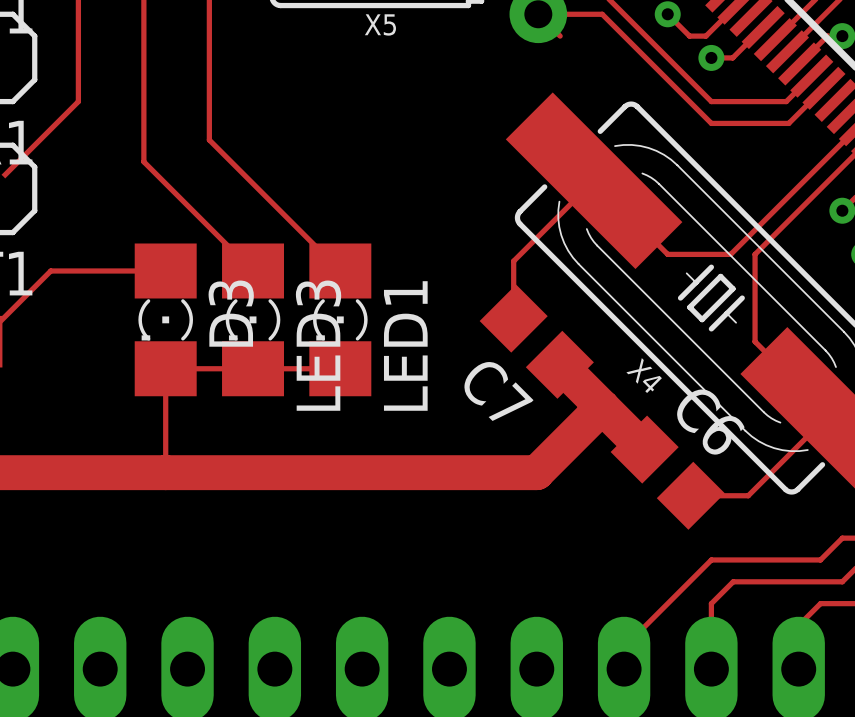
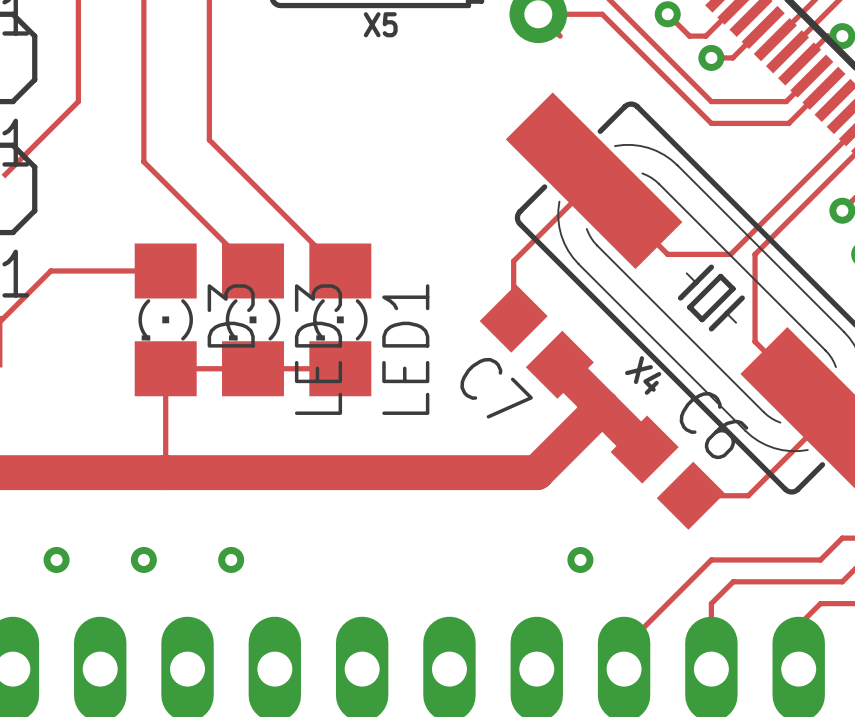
via: none -> (56, 559)
via: none -> (143, 559)
via: none -> (231, 559)
via: none -> (580, 559)

